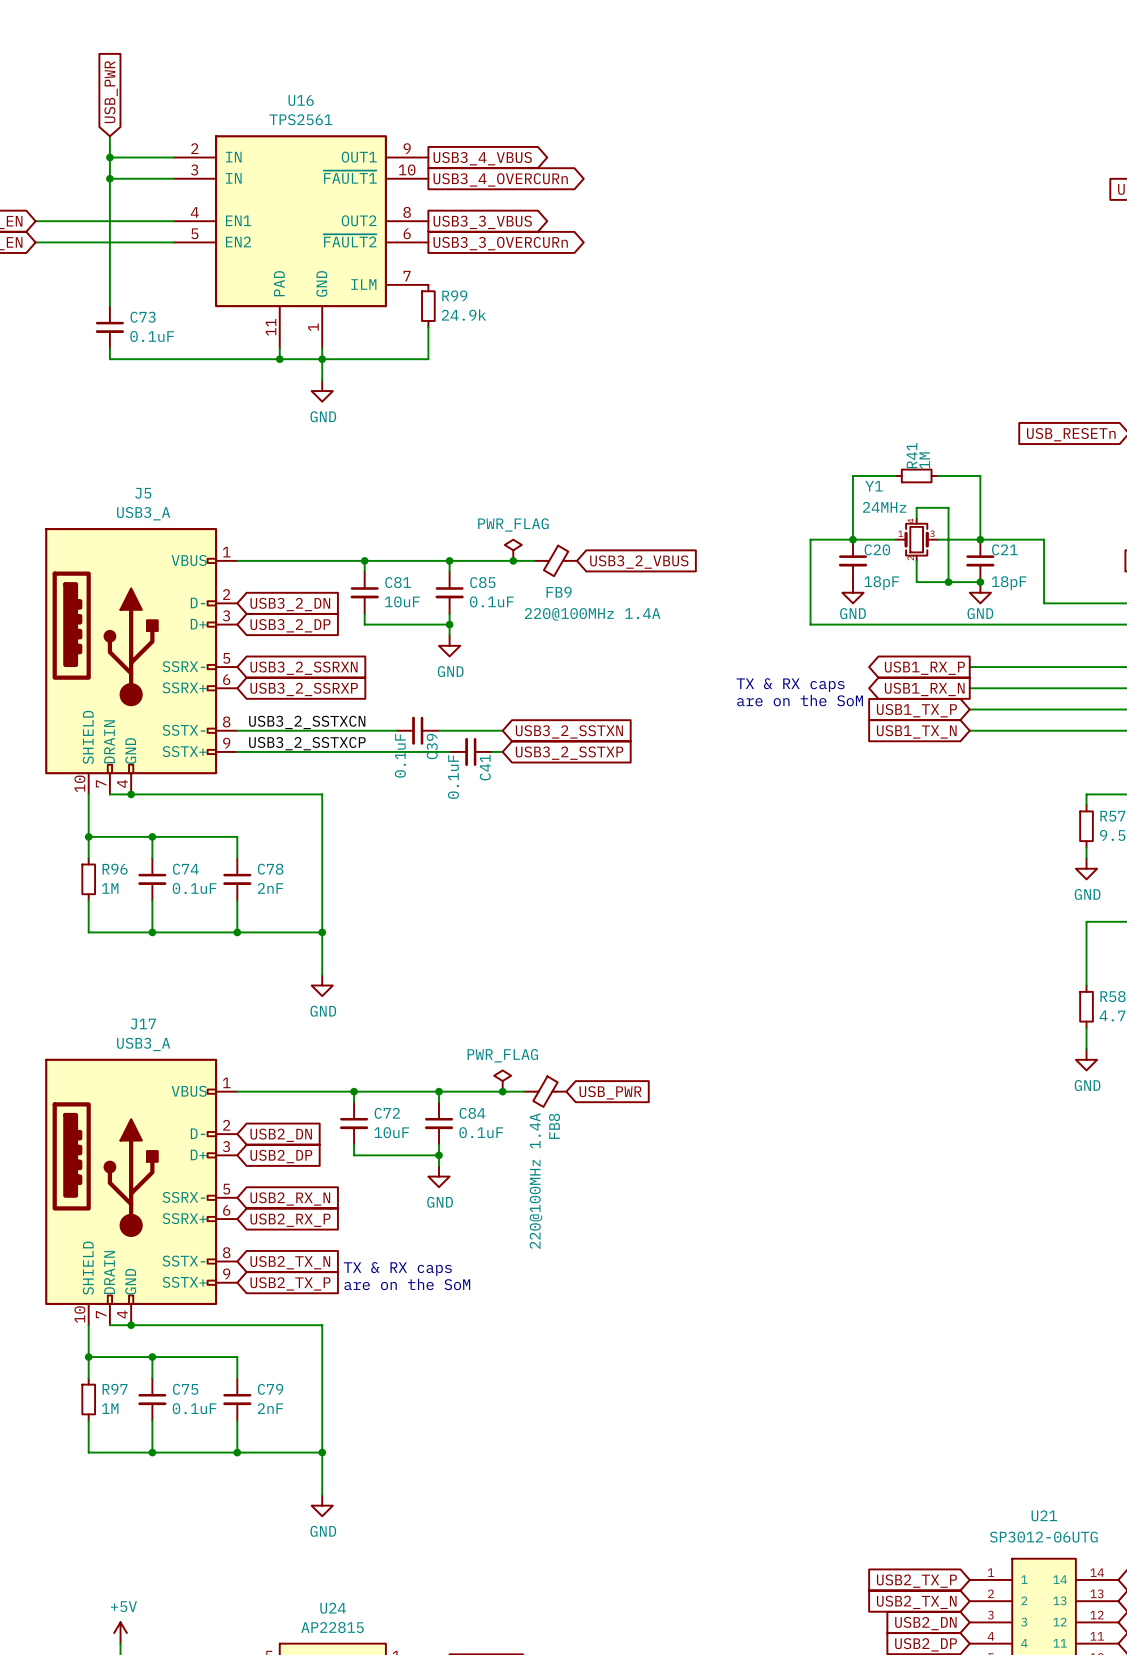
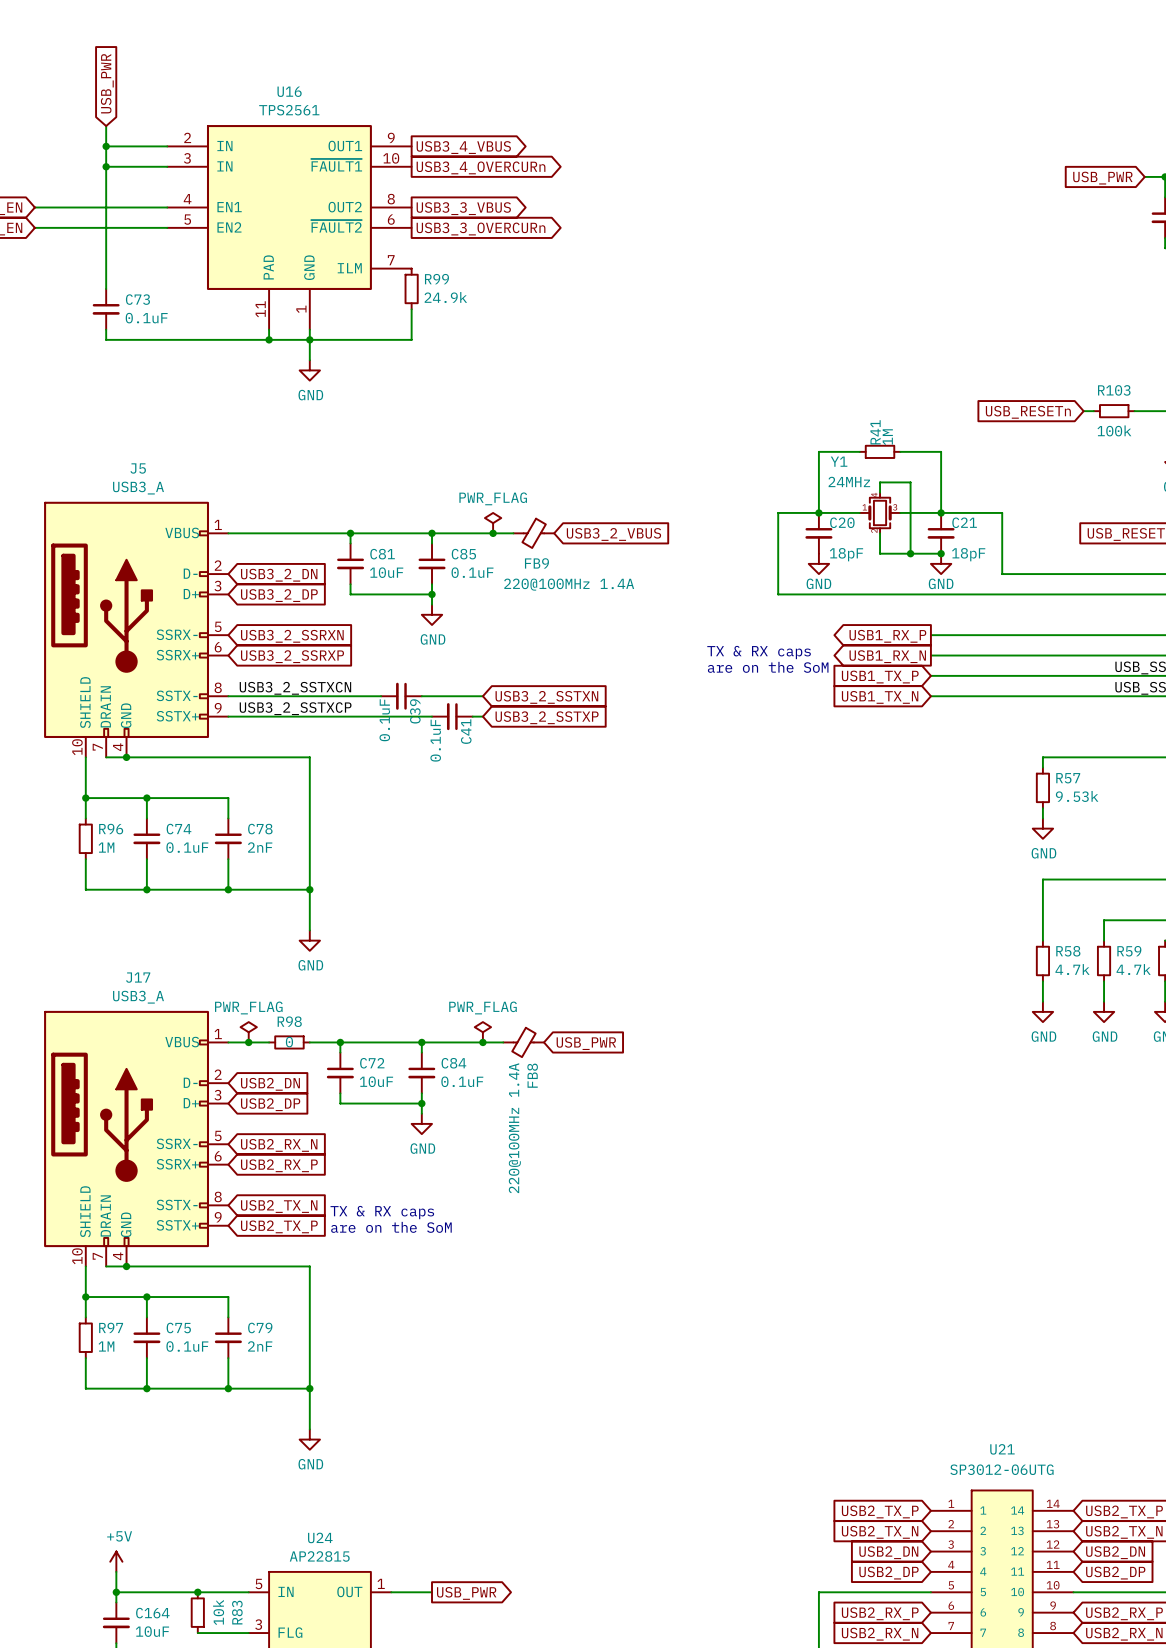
power symbol: none -> PWR_FLAG (248, 1032)
junction: none -> (248, 1042)
wire: (279, 1091) (322, 1091) -> none
R98: none -> 0 (289, 1042)

